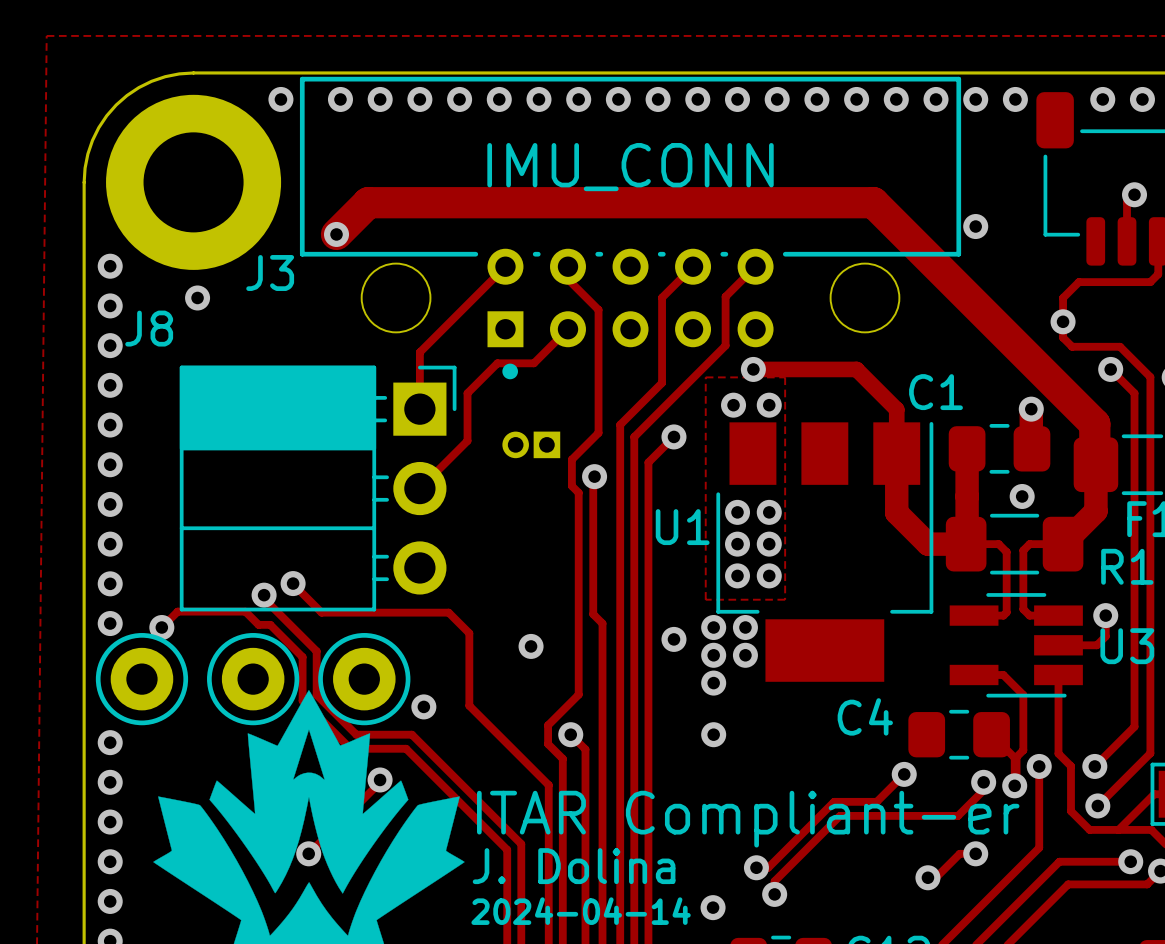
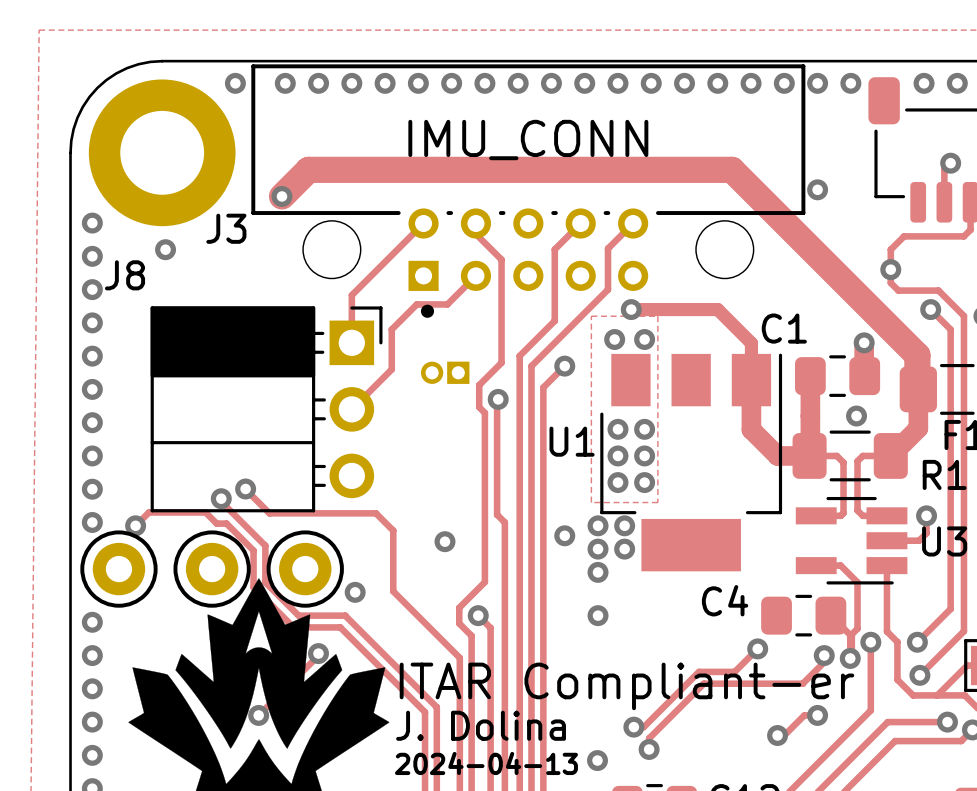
text: 2024-04-14 (581, 911) -> 2024-04-13 (486, 763)

